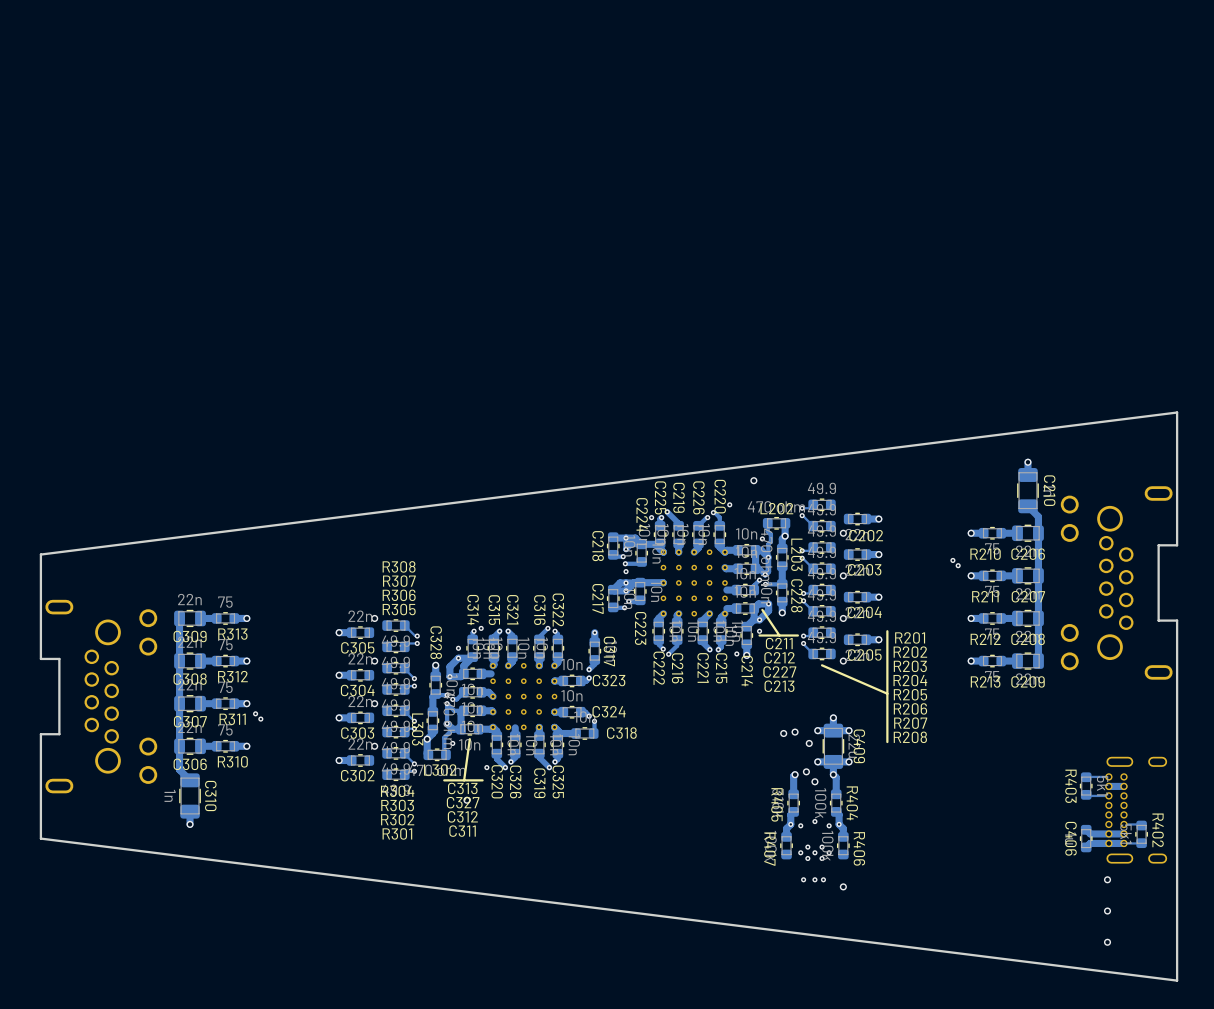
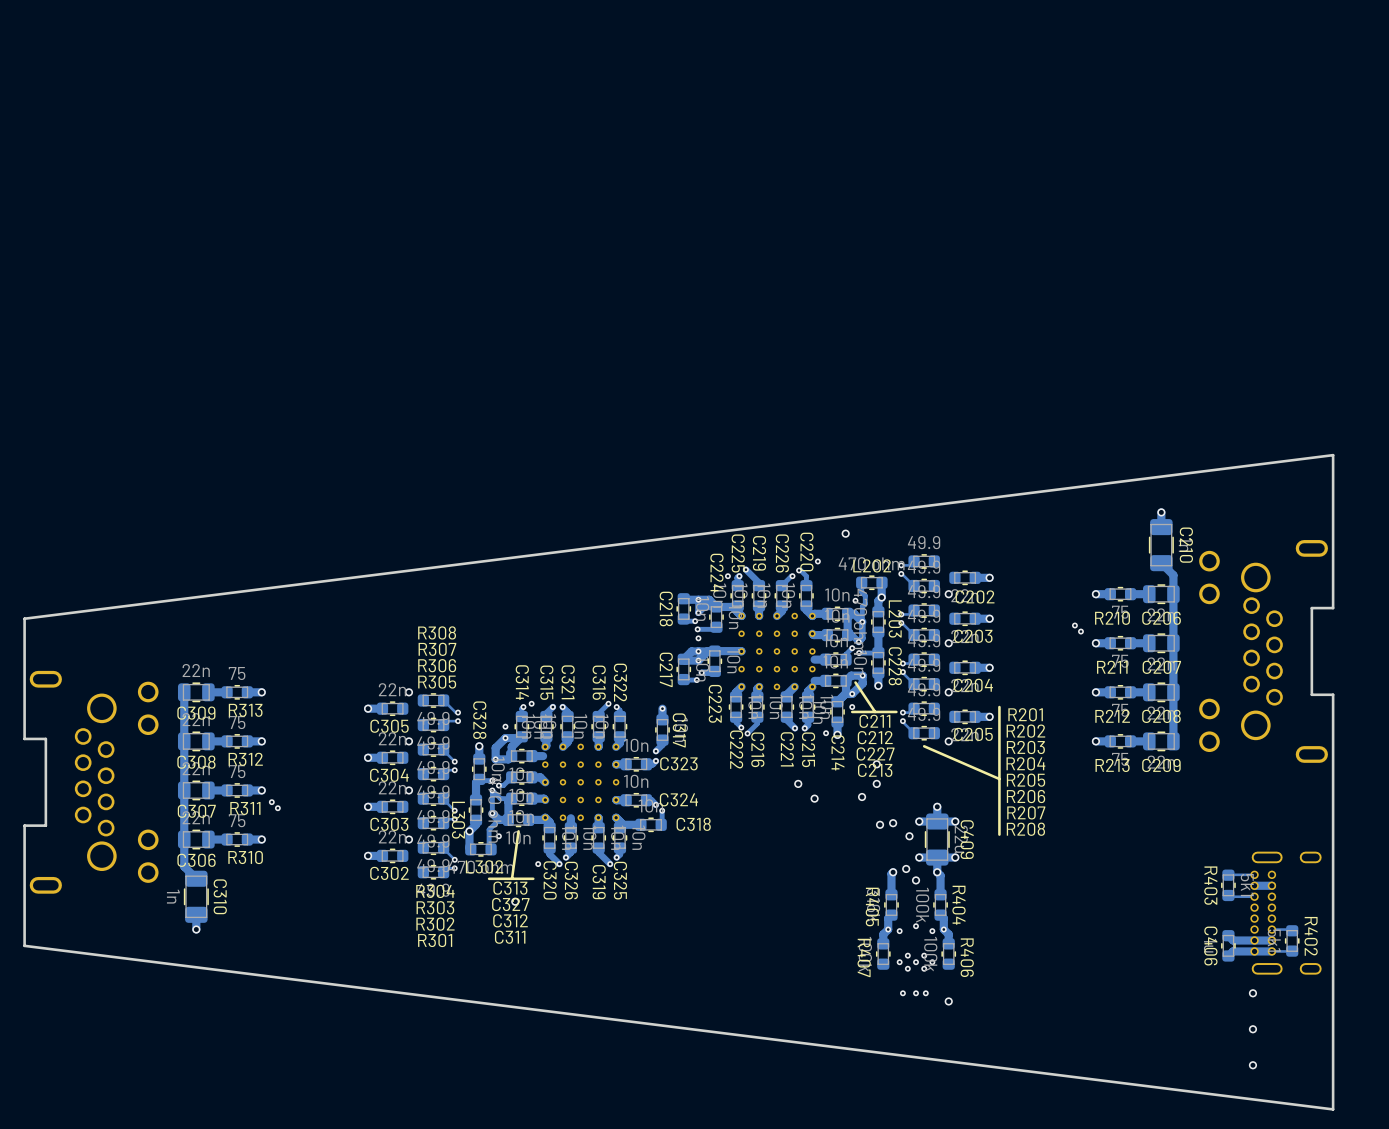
via: none -> (876, 764)
via: none -> (798, 783)
via: none -> (876, 783)
via: none -> (862, 797)
via: none -> (814, 798)

